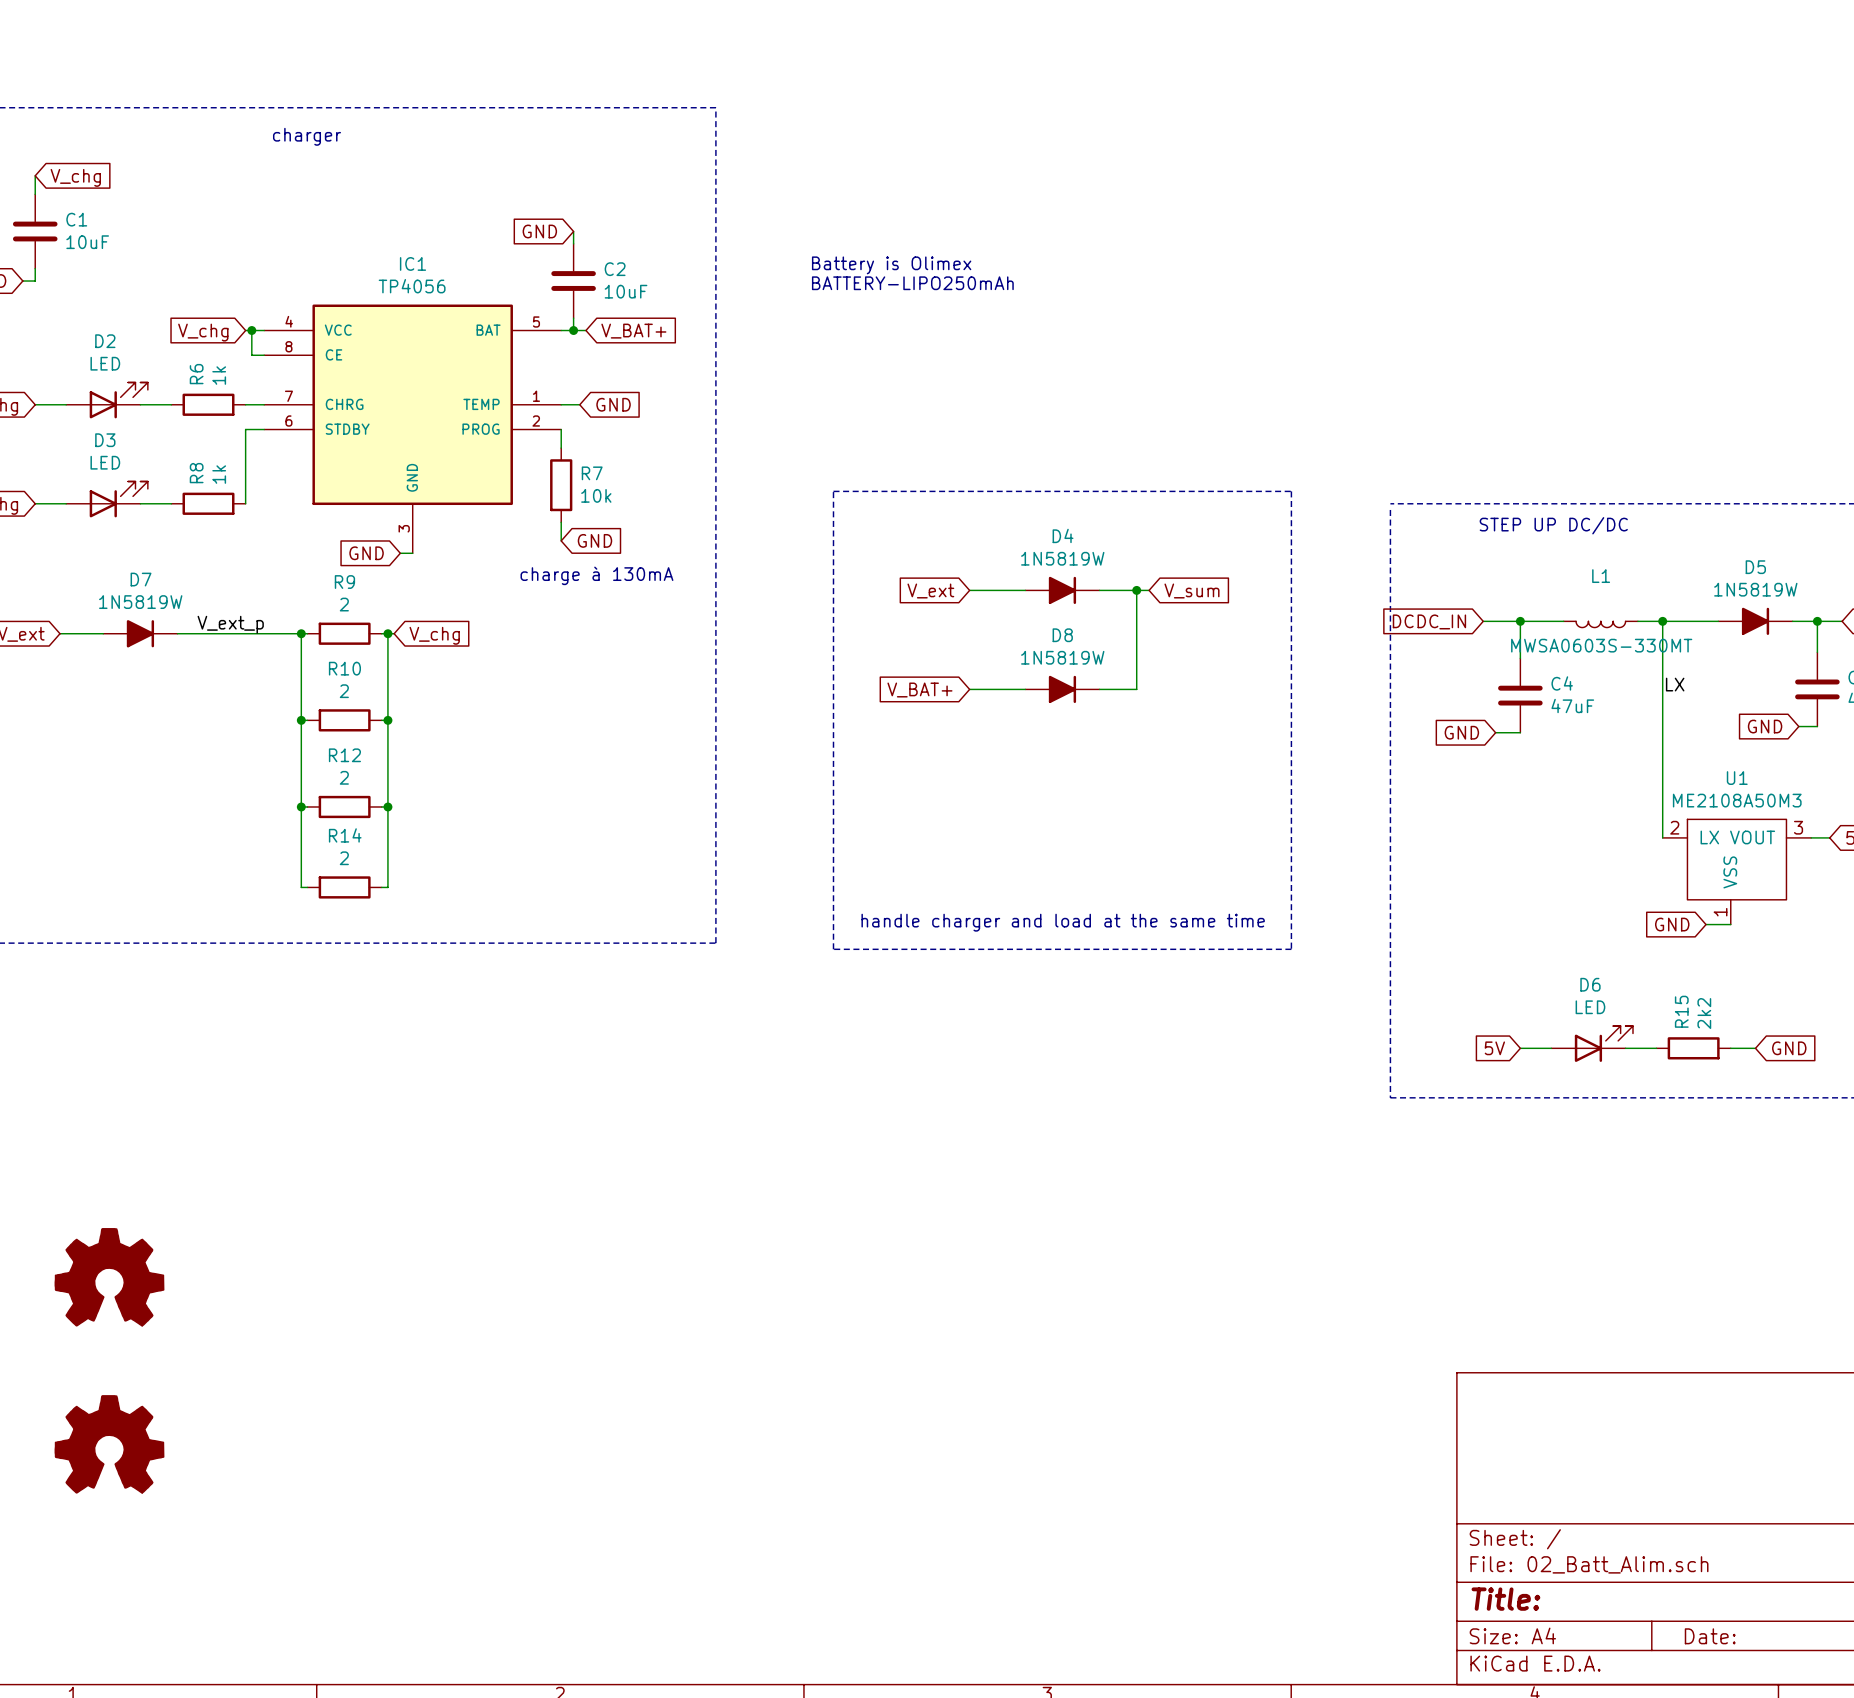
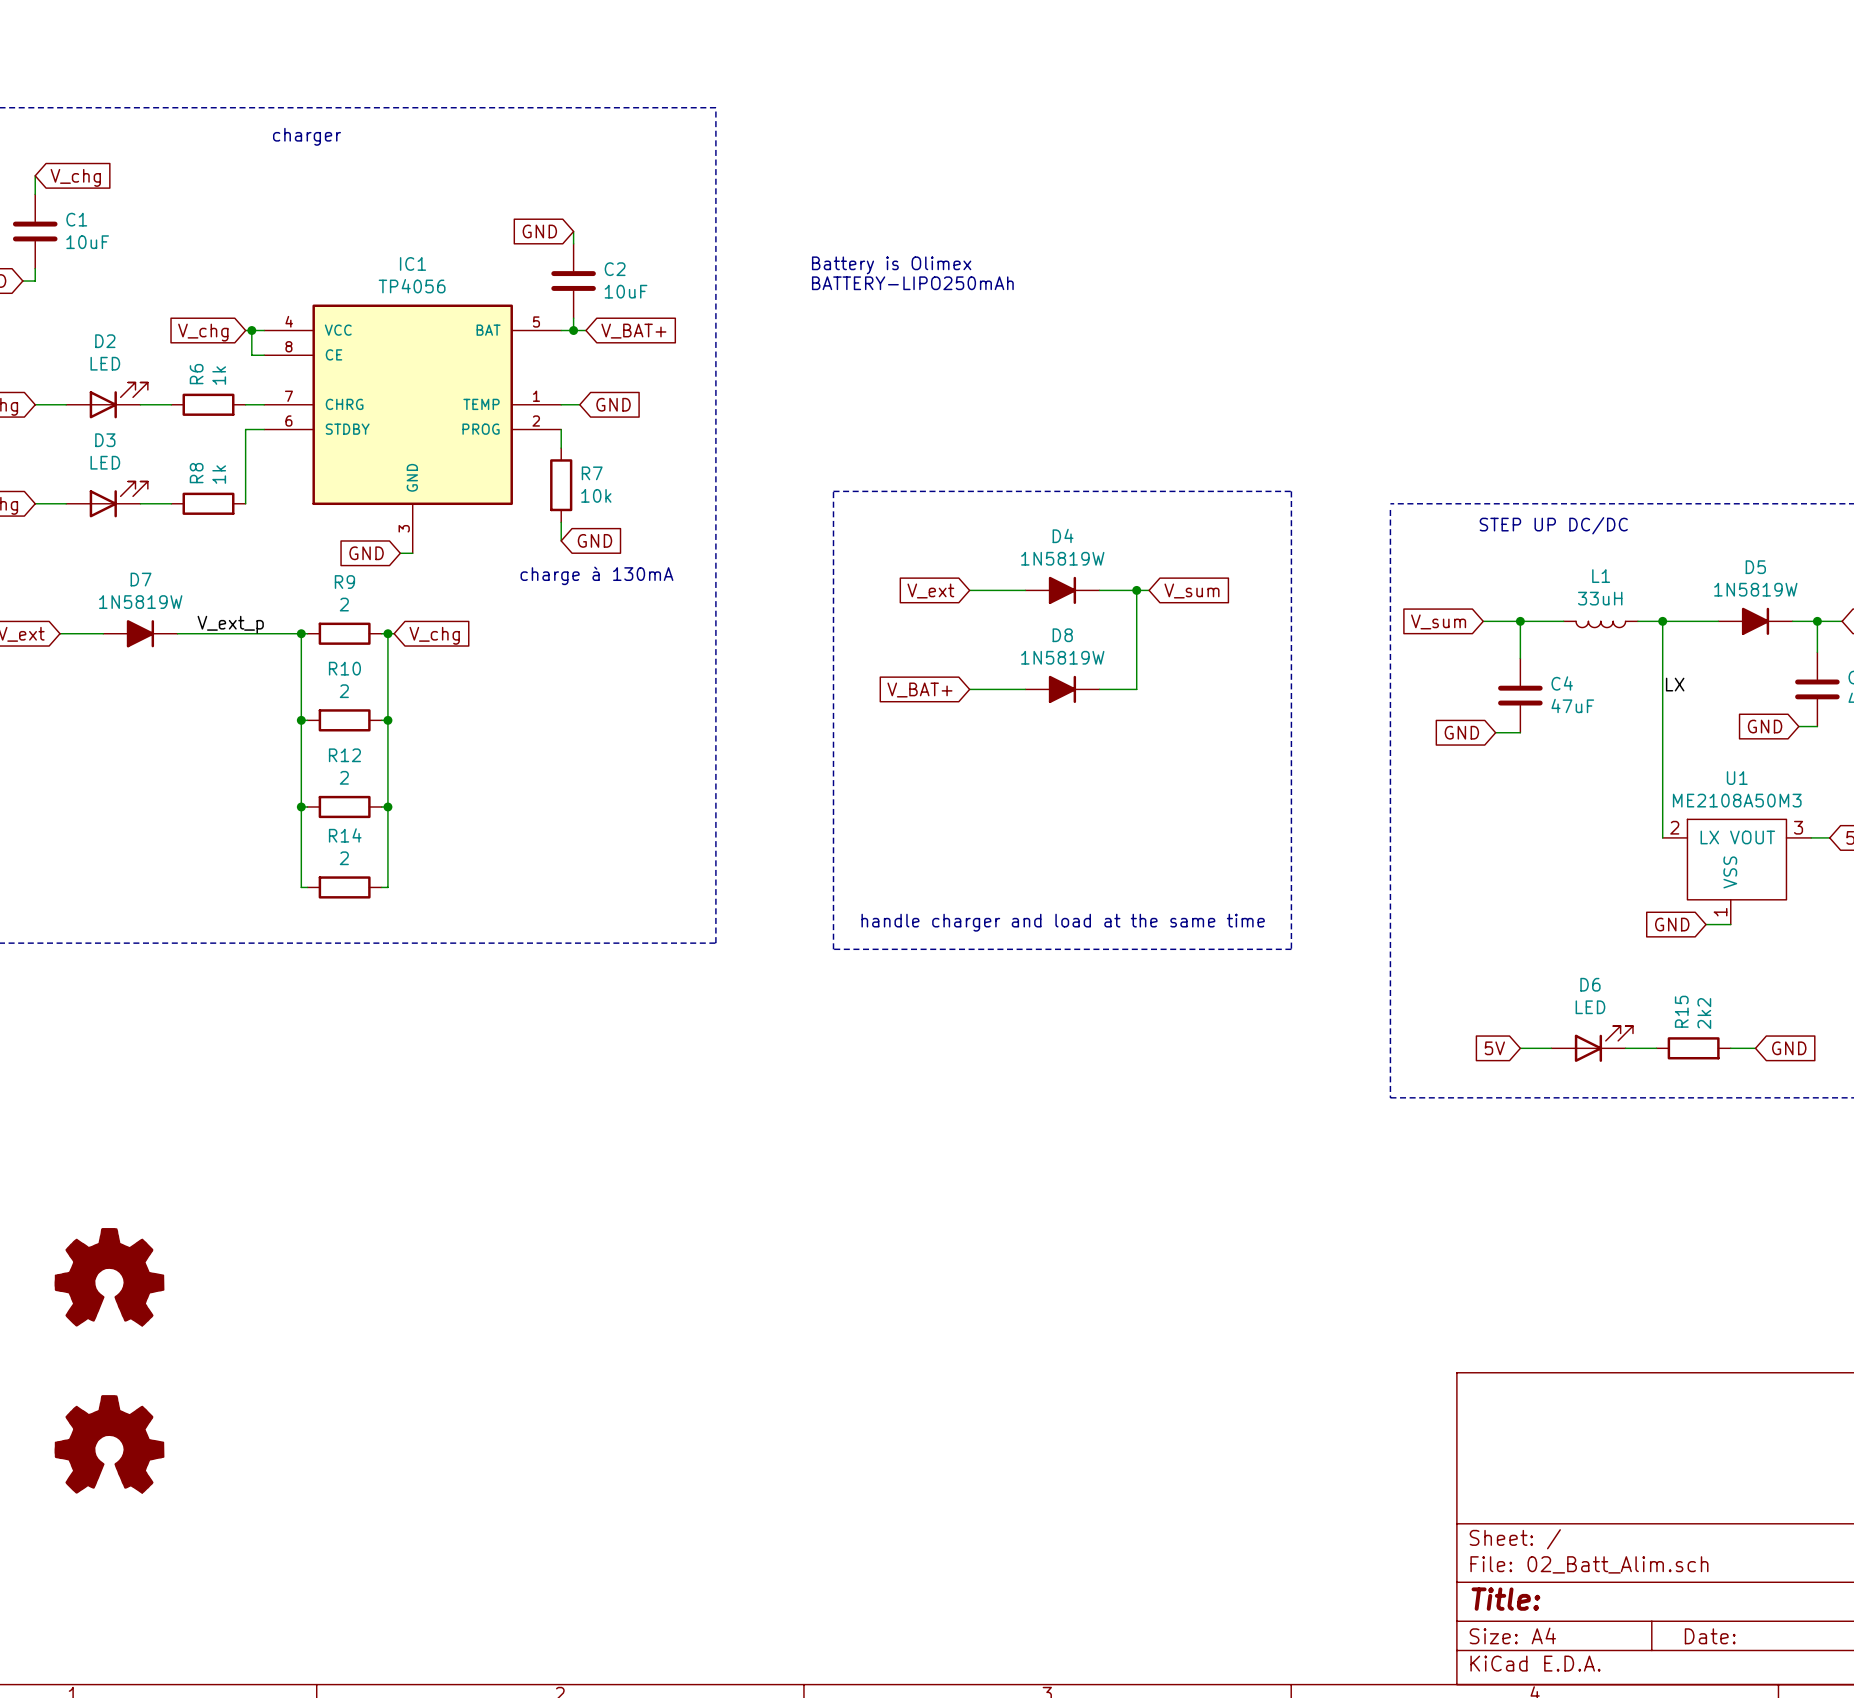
global label: DCDC_IN (1429, 621) -> V_sum (1438, 621)
L1 value: MWSA0603S-330MT (1601, 645) -> 33uH (1600, 598)

